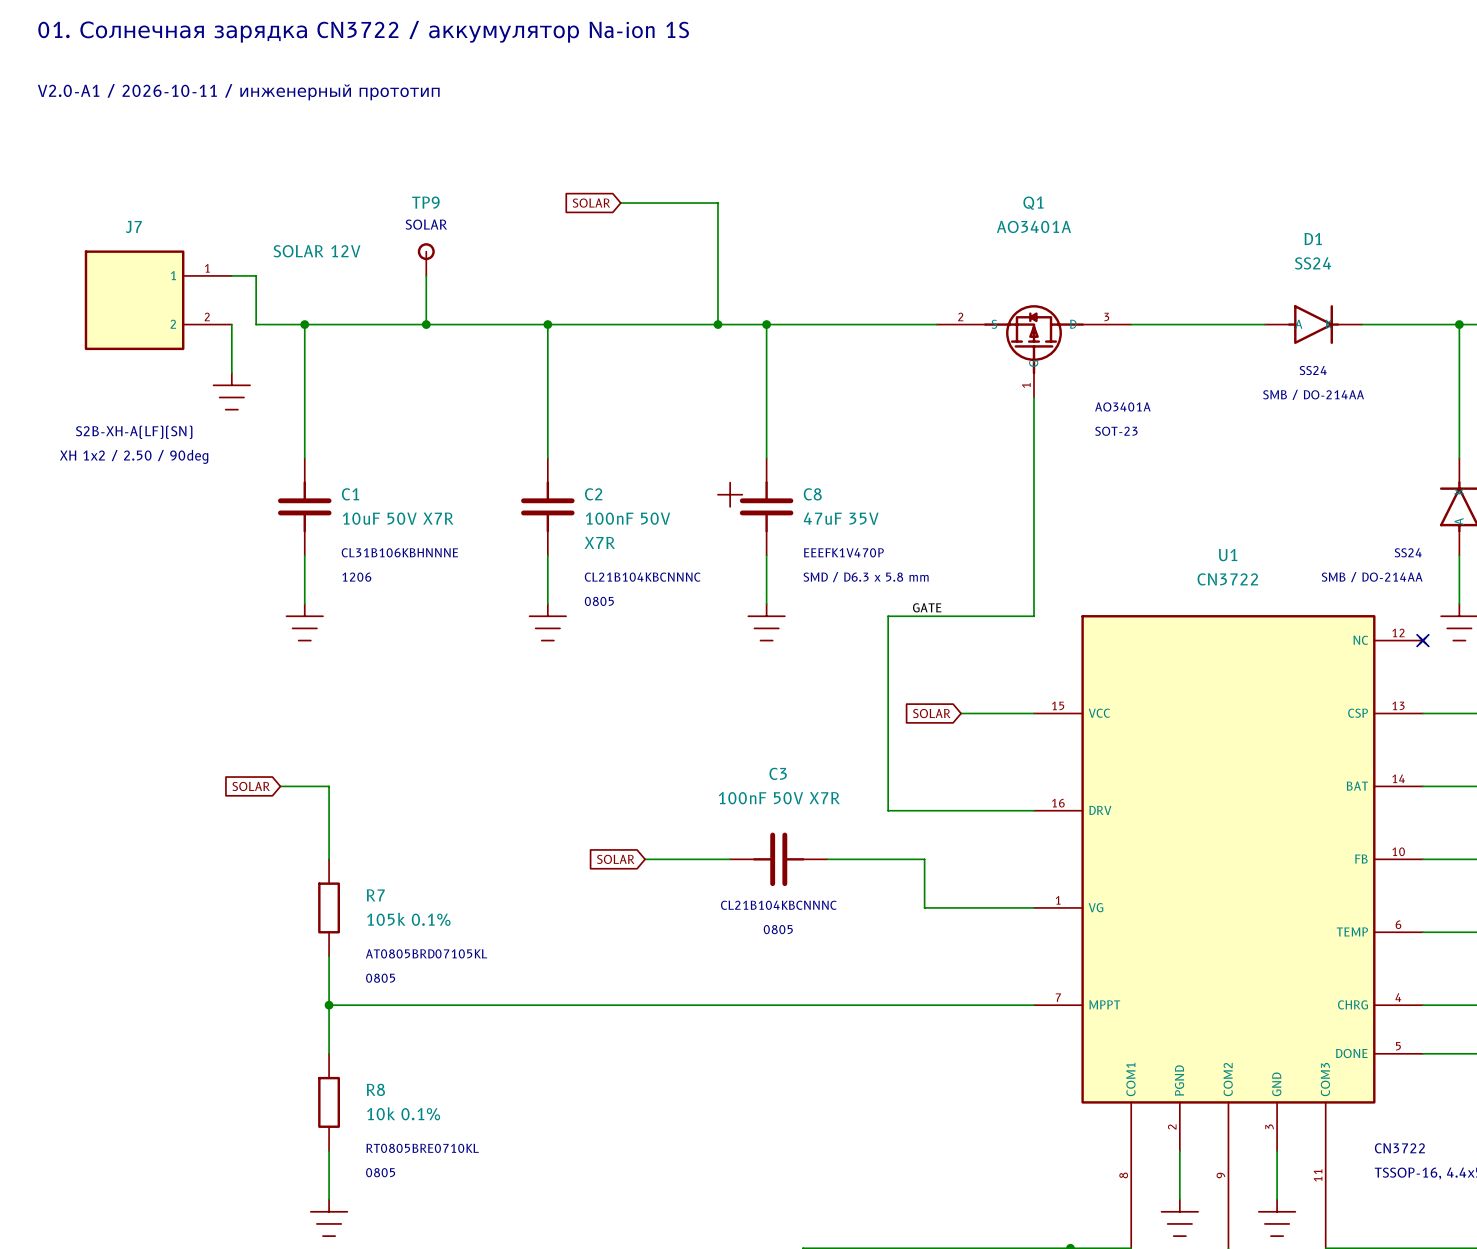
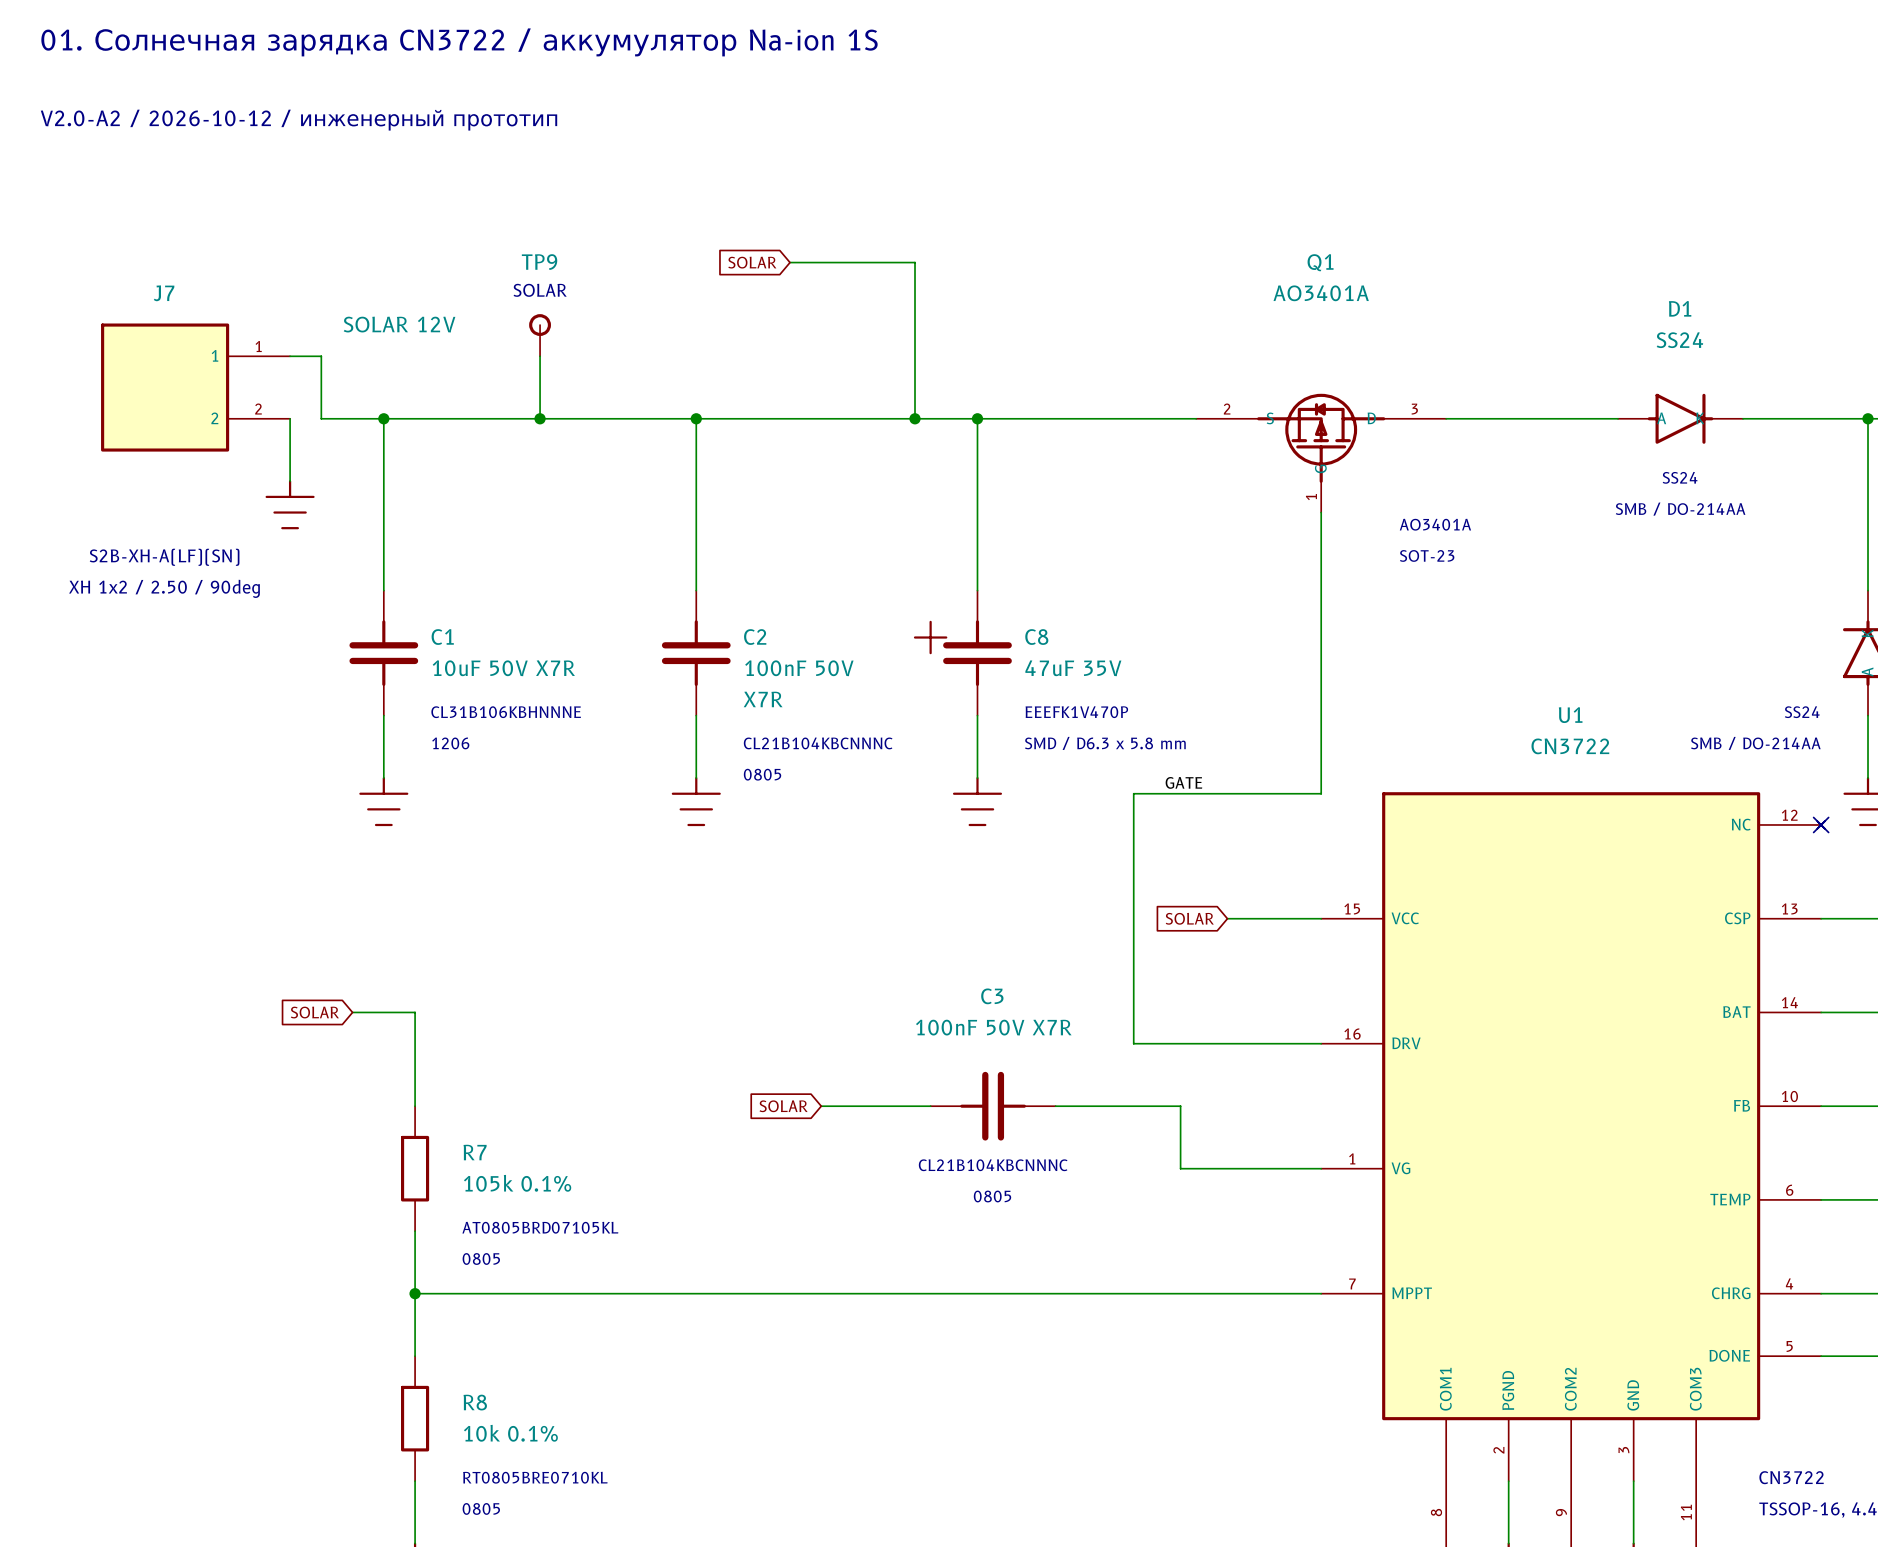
text: V2.0-A1 / 2026-10-11 / инженерный прототип (238, 92) -> V2.0-A2 / 2026-10-12 / инженерный прототип (298, 120)

